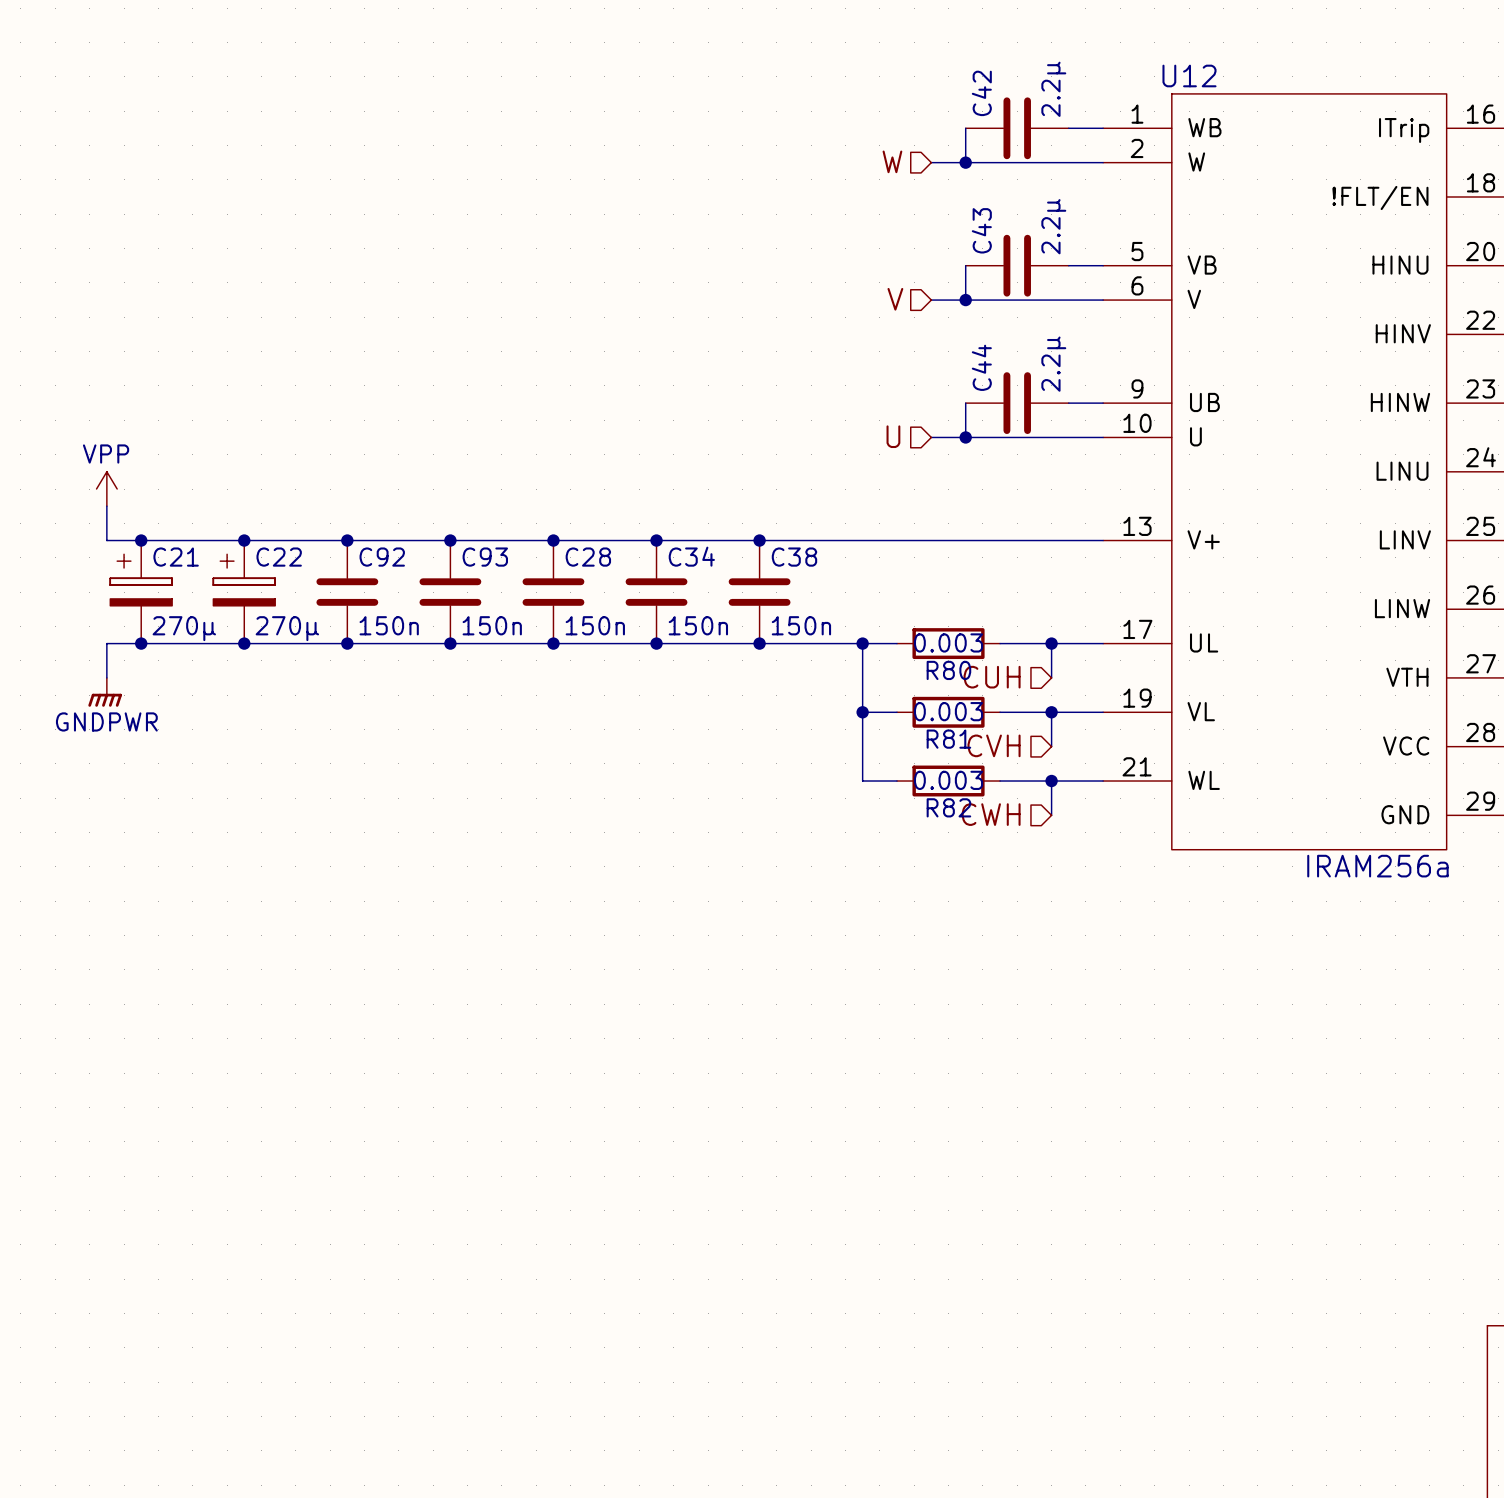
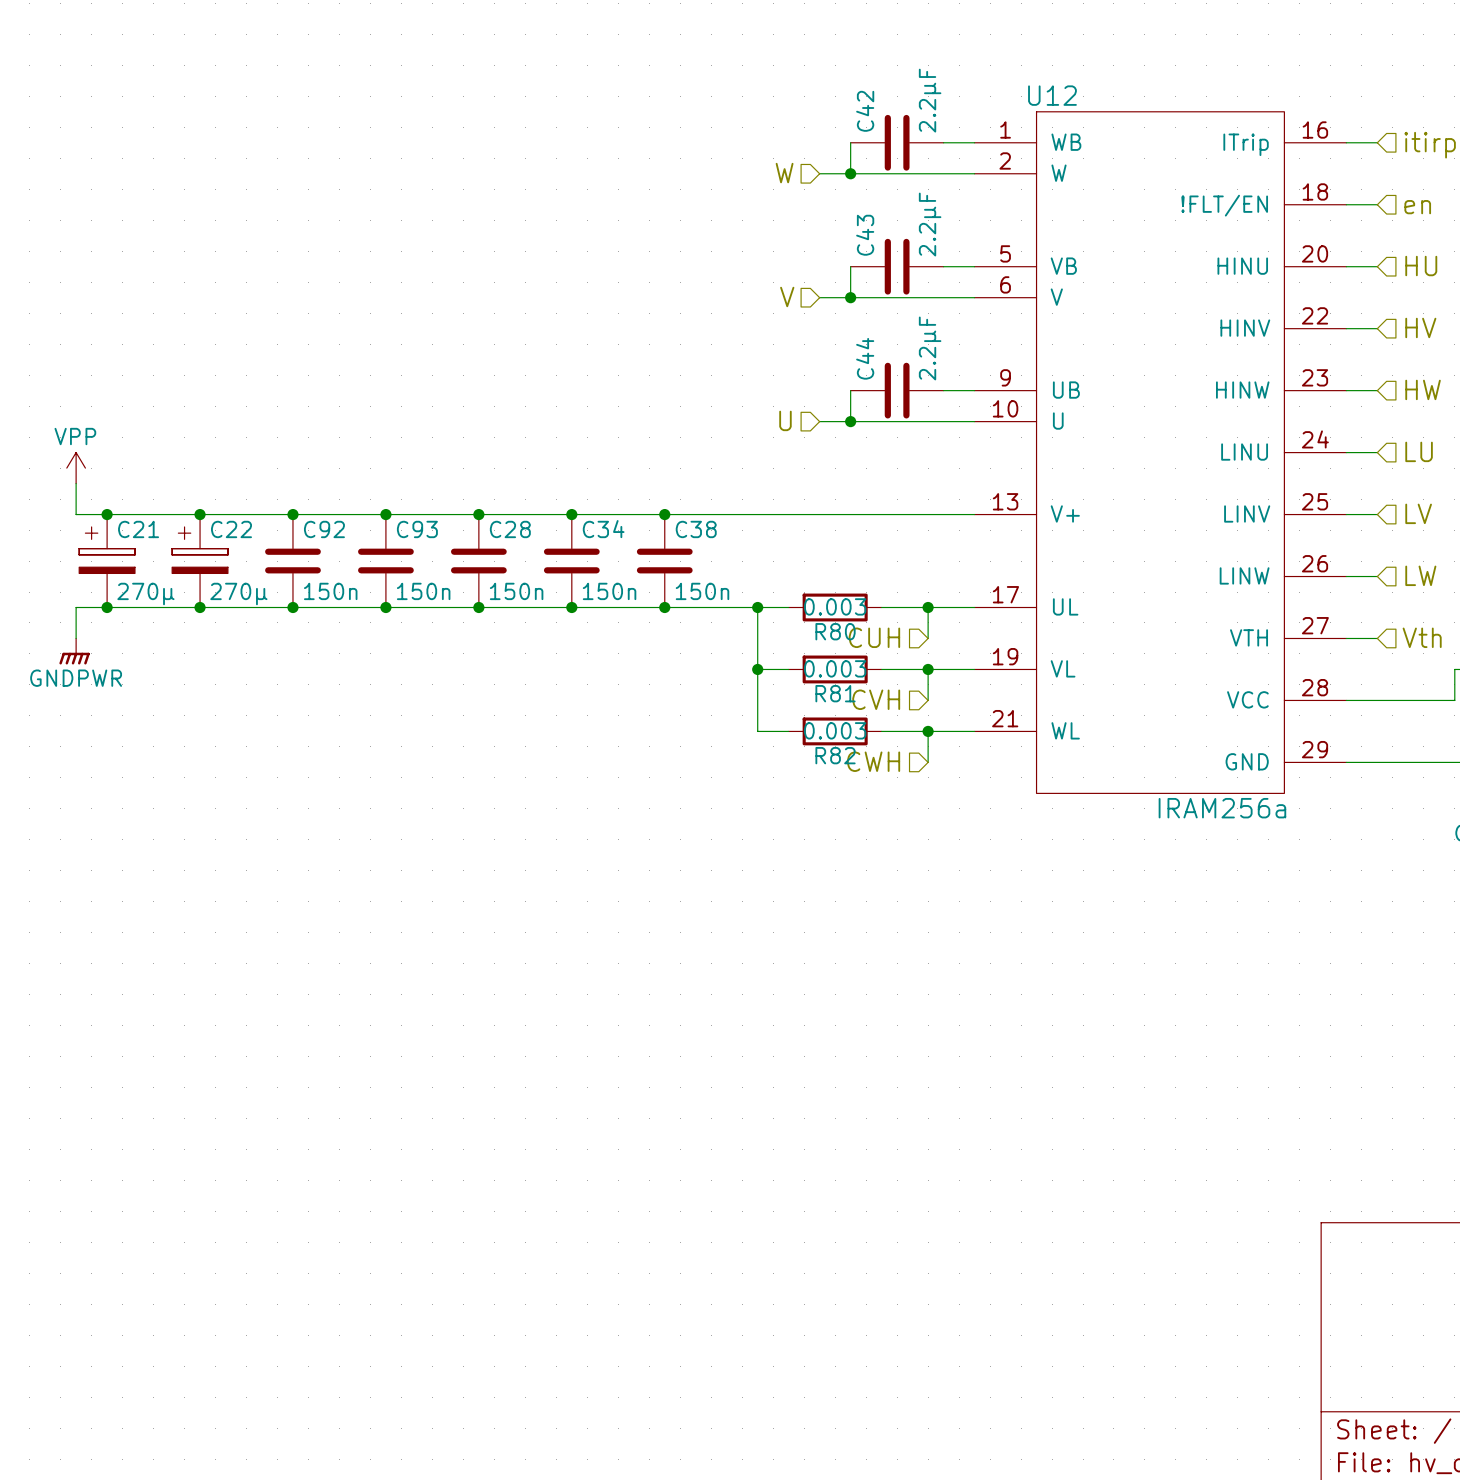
C42 value: 2.2µ (1053, 89) -> 2.2µF (930, 100)
C43 value: 2.2µ (1053, 226) -> 2.2µF (930, 224)
C44 value: 2.2µ (1053, 364) -> 2.2µF (930, 348)

